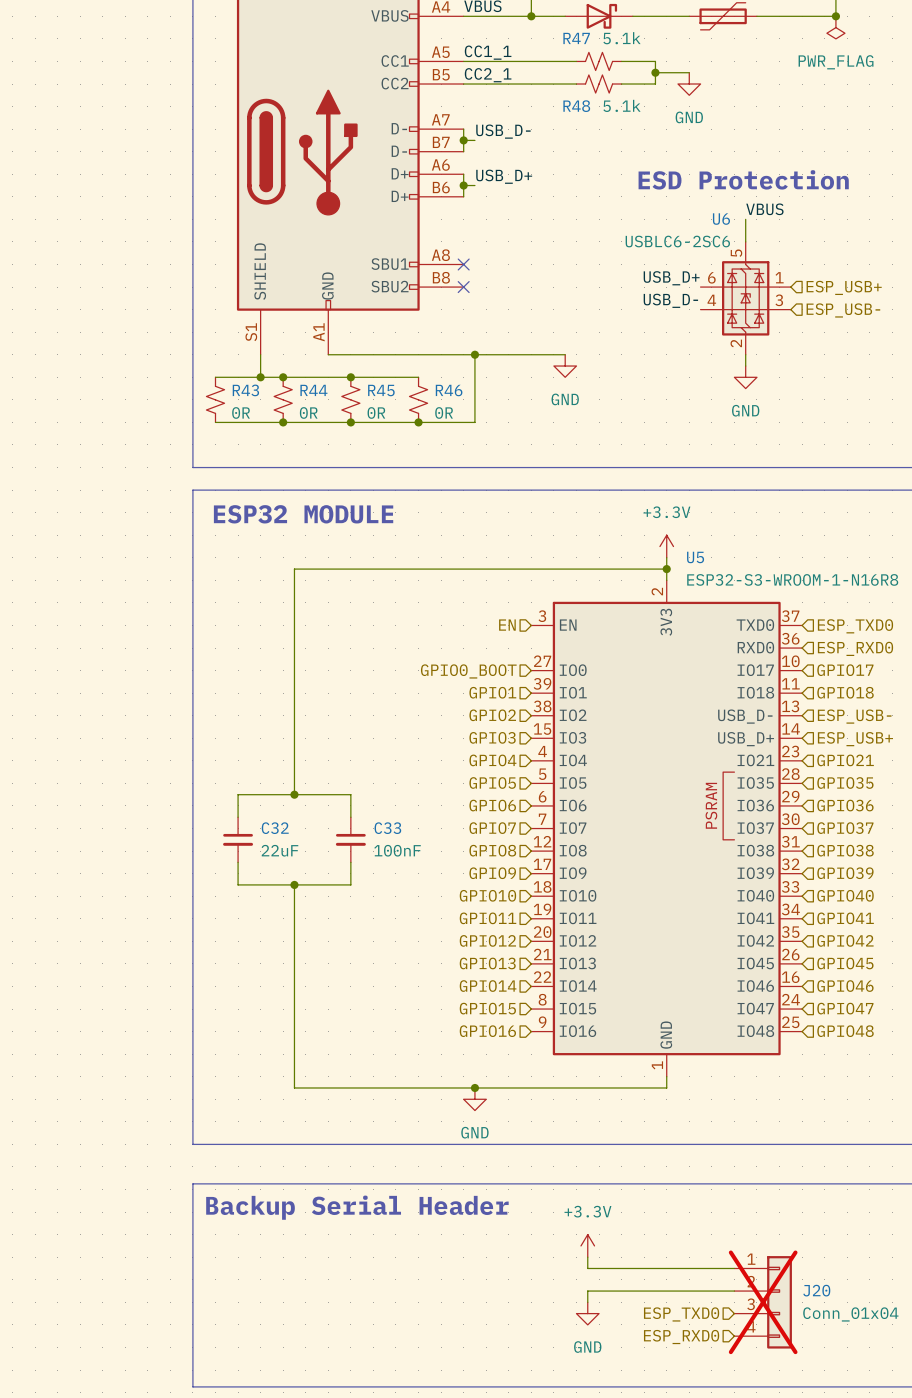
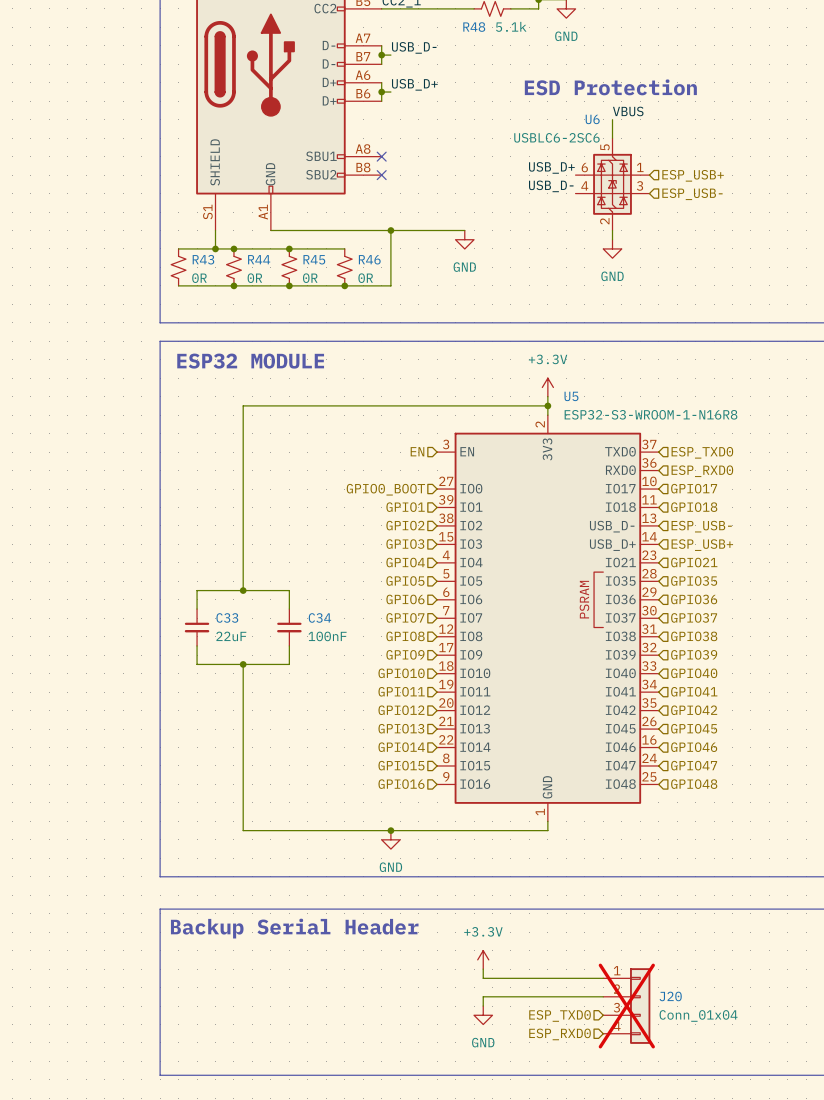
C32 name: C32 (275, 828) -> C33 (227, 617)
C33 name: C33 (387, 828) -> C34 (319, 617)

